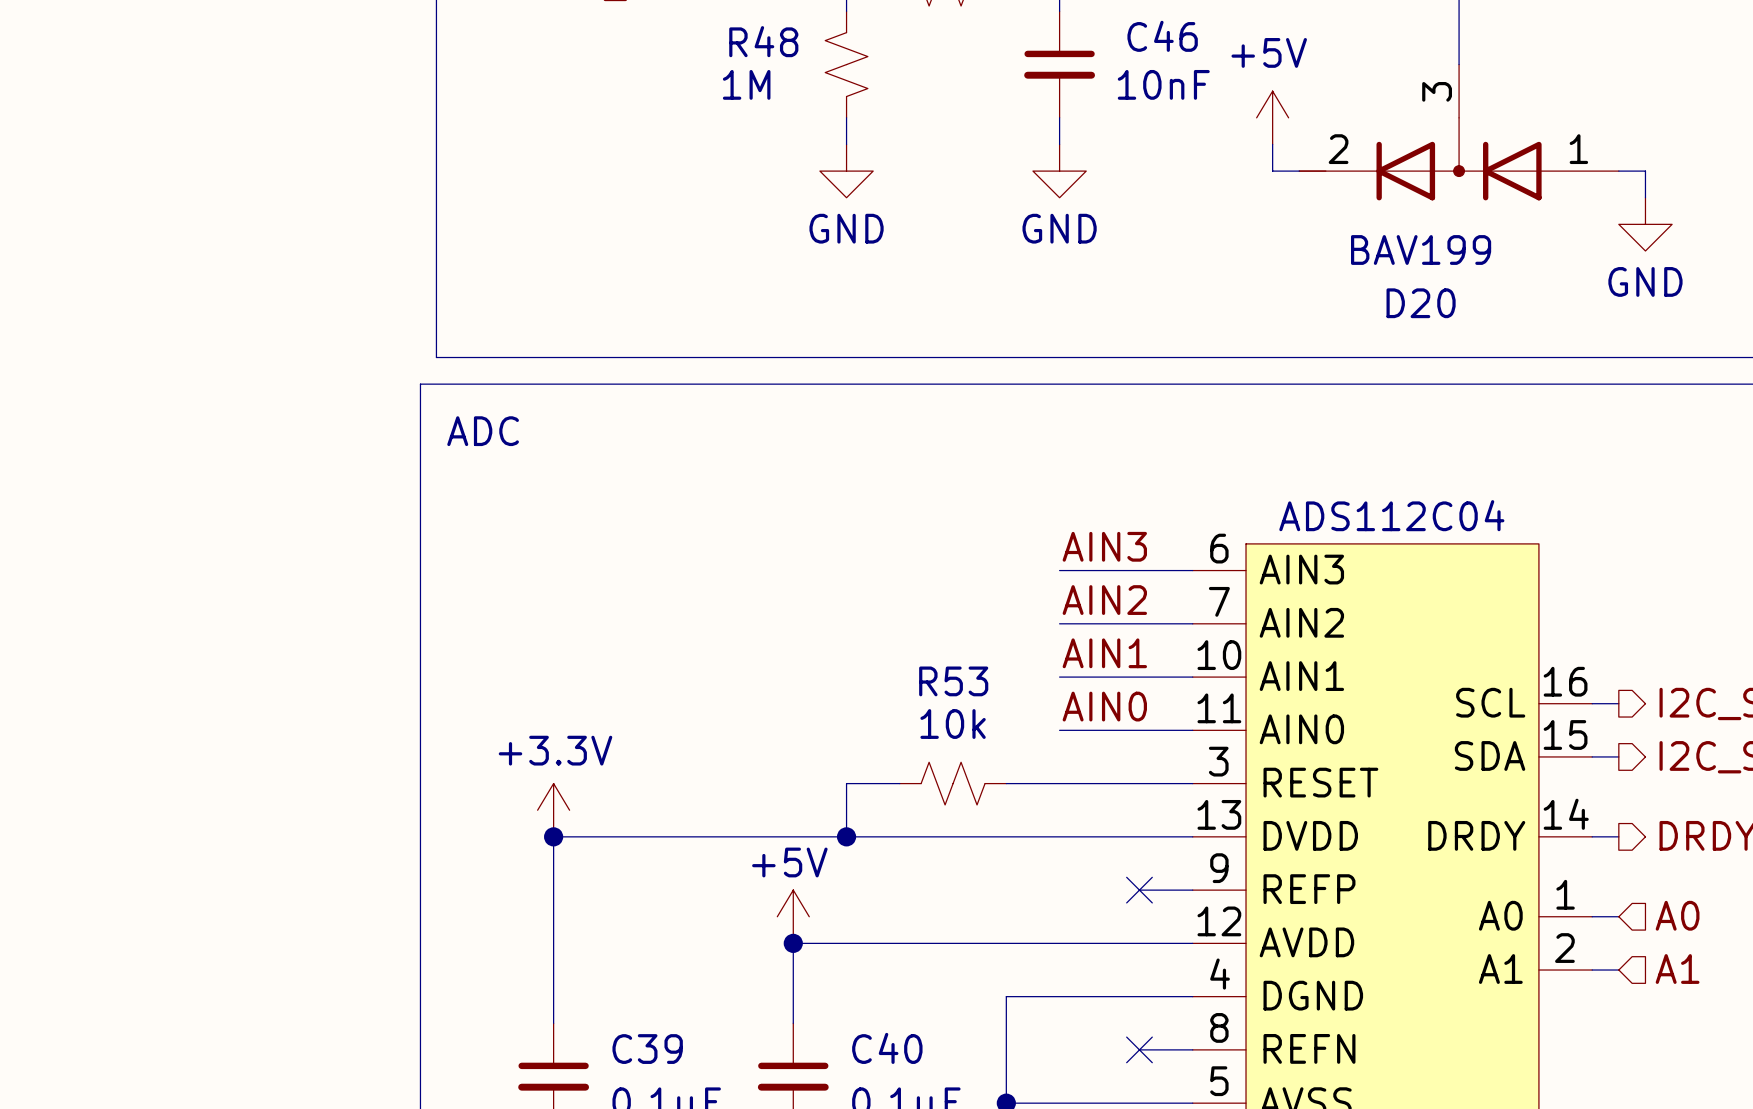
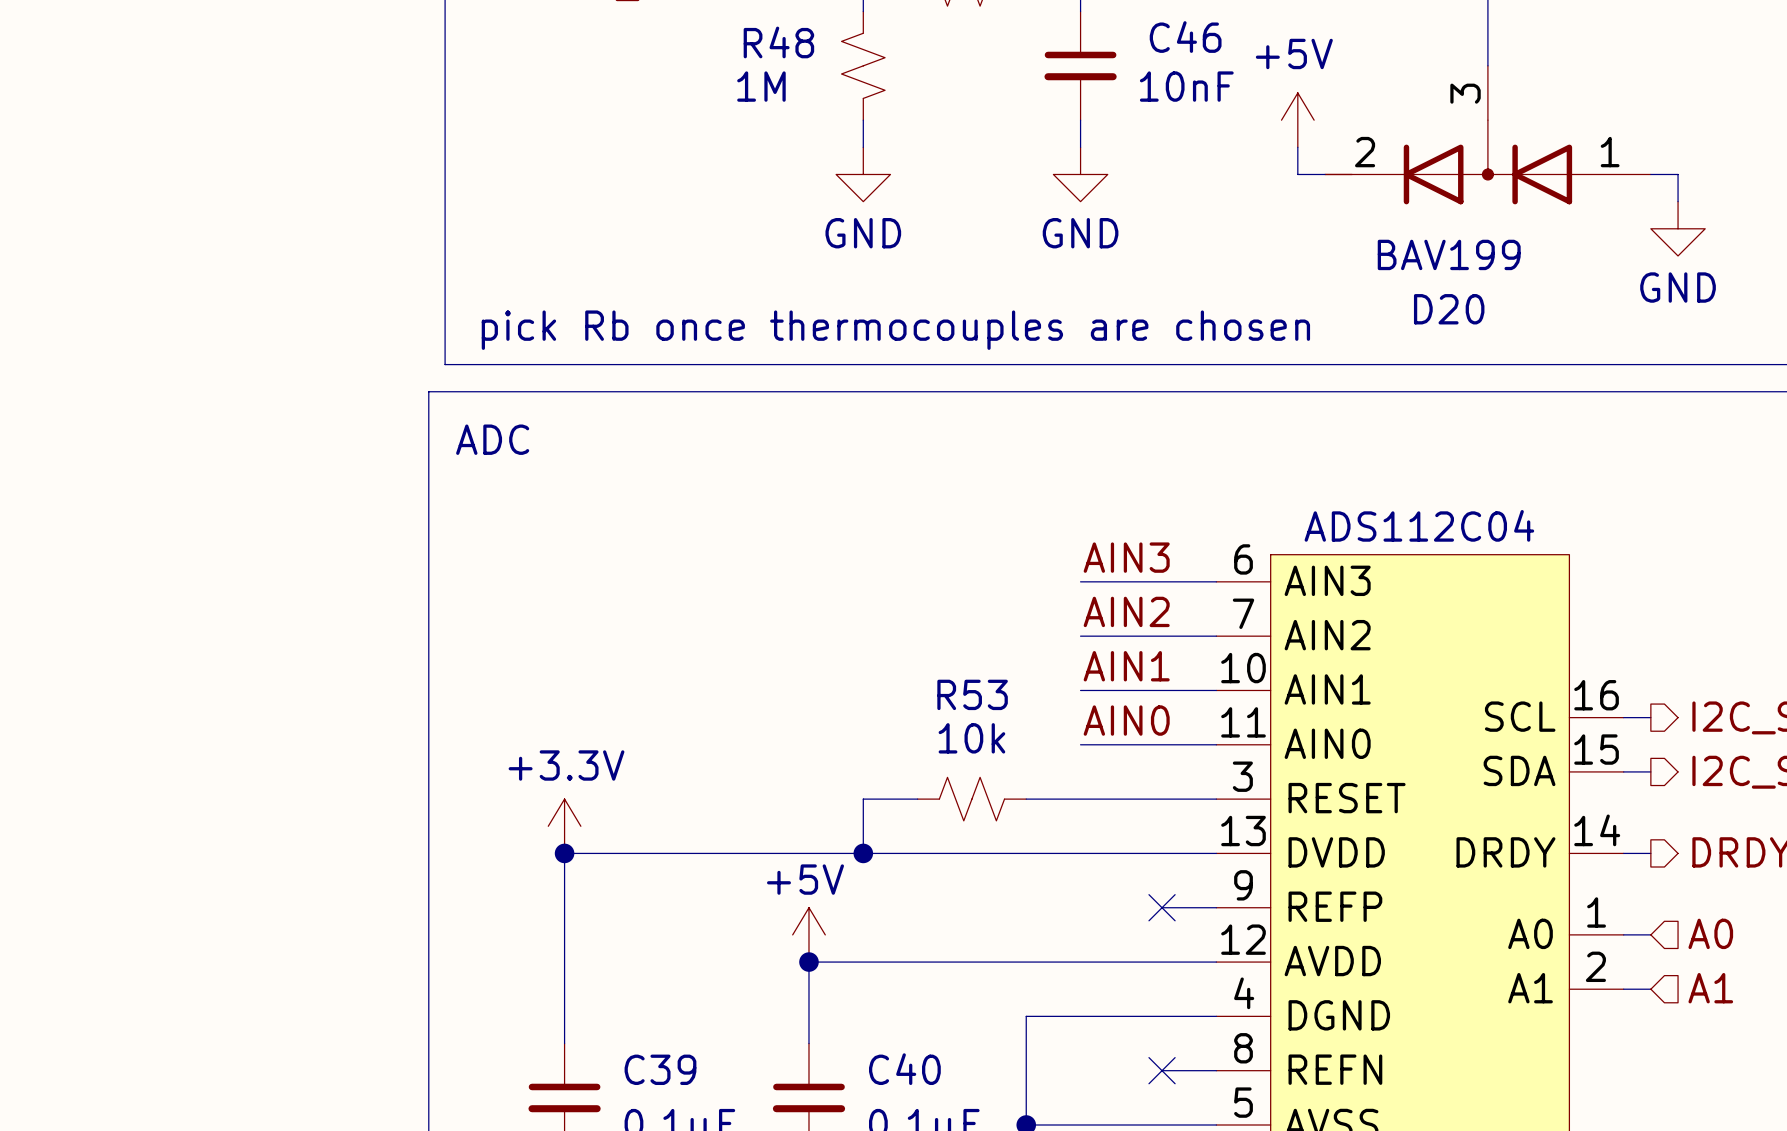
text: none -> pick Rb once thermocouples are chosen (895, 330)

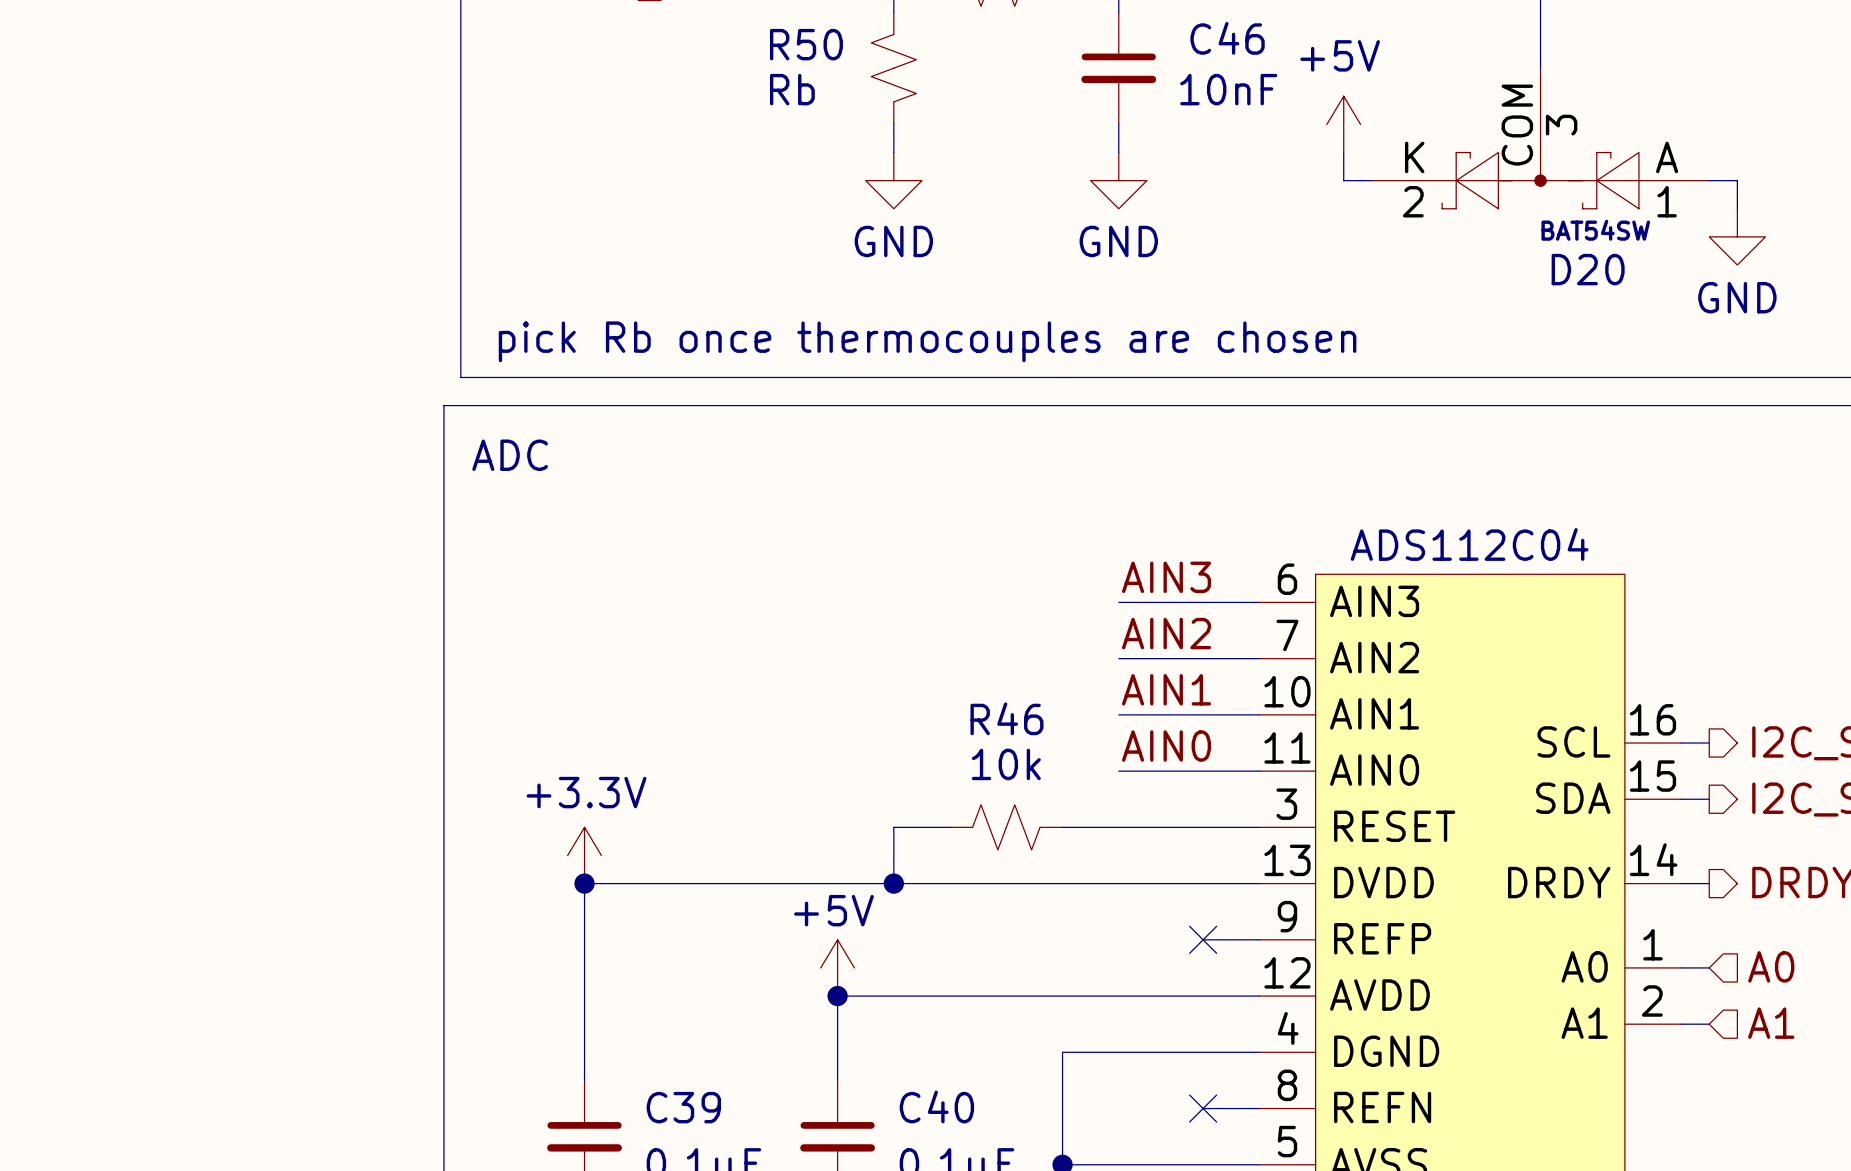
R48 name: R48 (778, 42) -> R50 (806, 44)
D20 symbol: [1324, 65, 1651, 205] -> [1371, 68, 1710, 209]
R48 value: 1M (761, 86) -> Rb (792, 89)
D20 value: BAV199 (1449, 254) -> BAT54SW (1595, 230)
D20 name position: D20 (1449, 309) -> D20 (1588, 269)
R53 name: R53 (972, 694) -> R46 (1006, 718)

